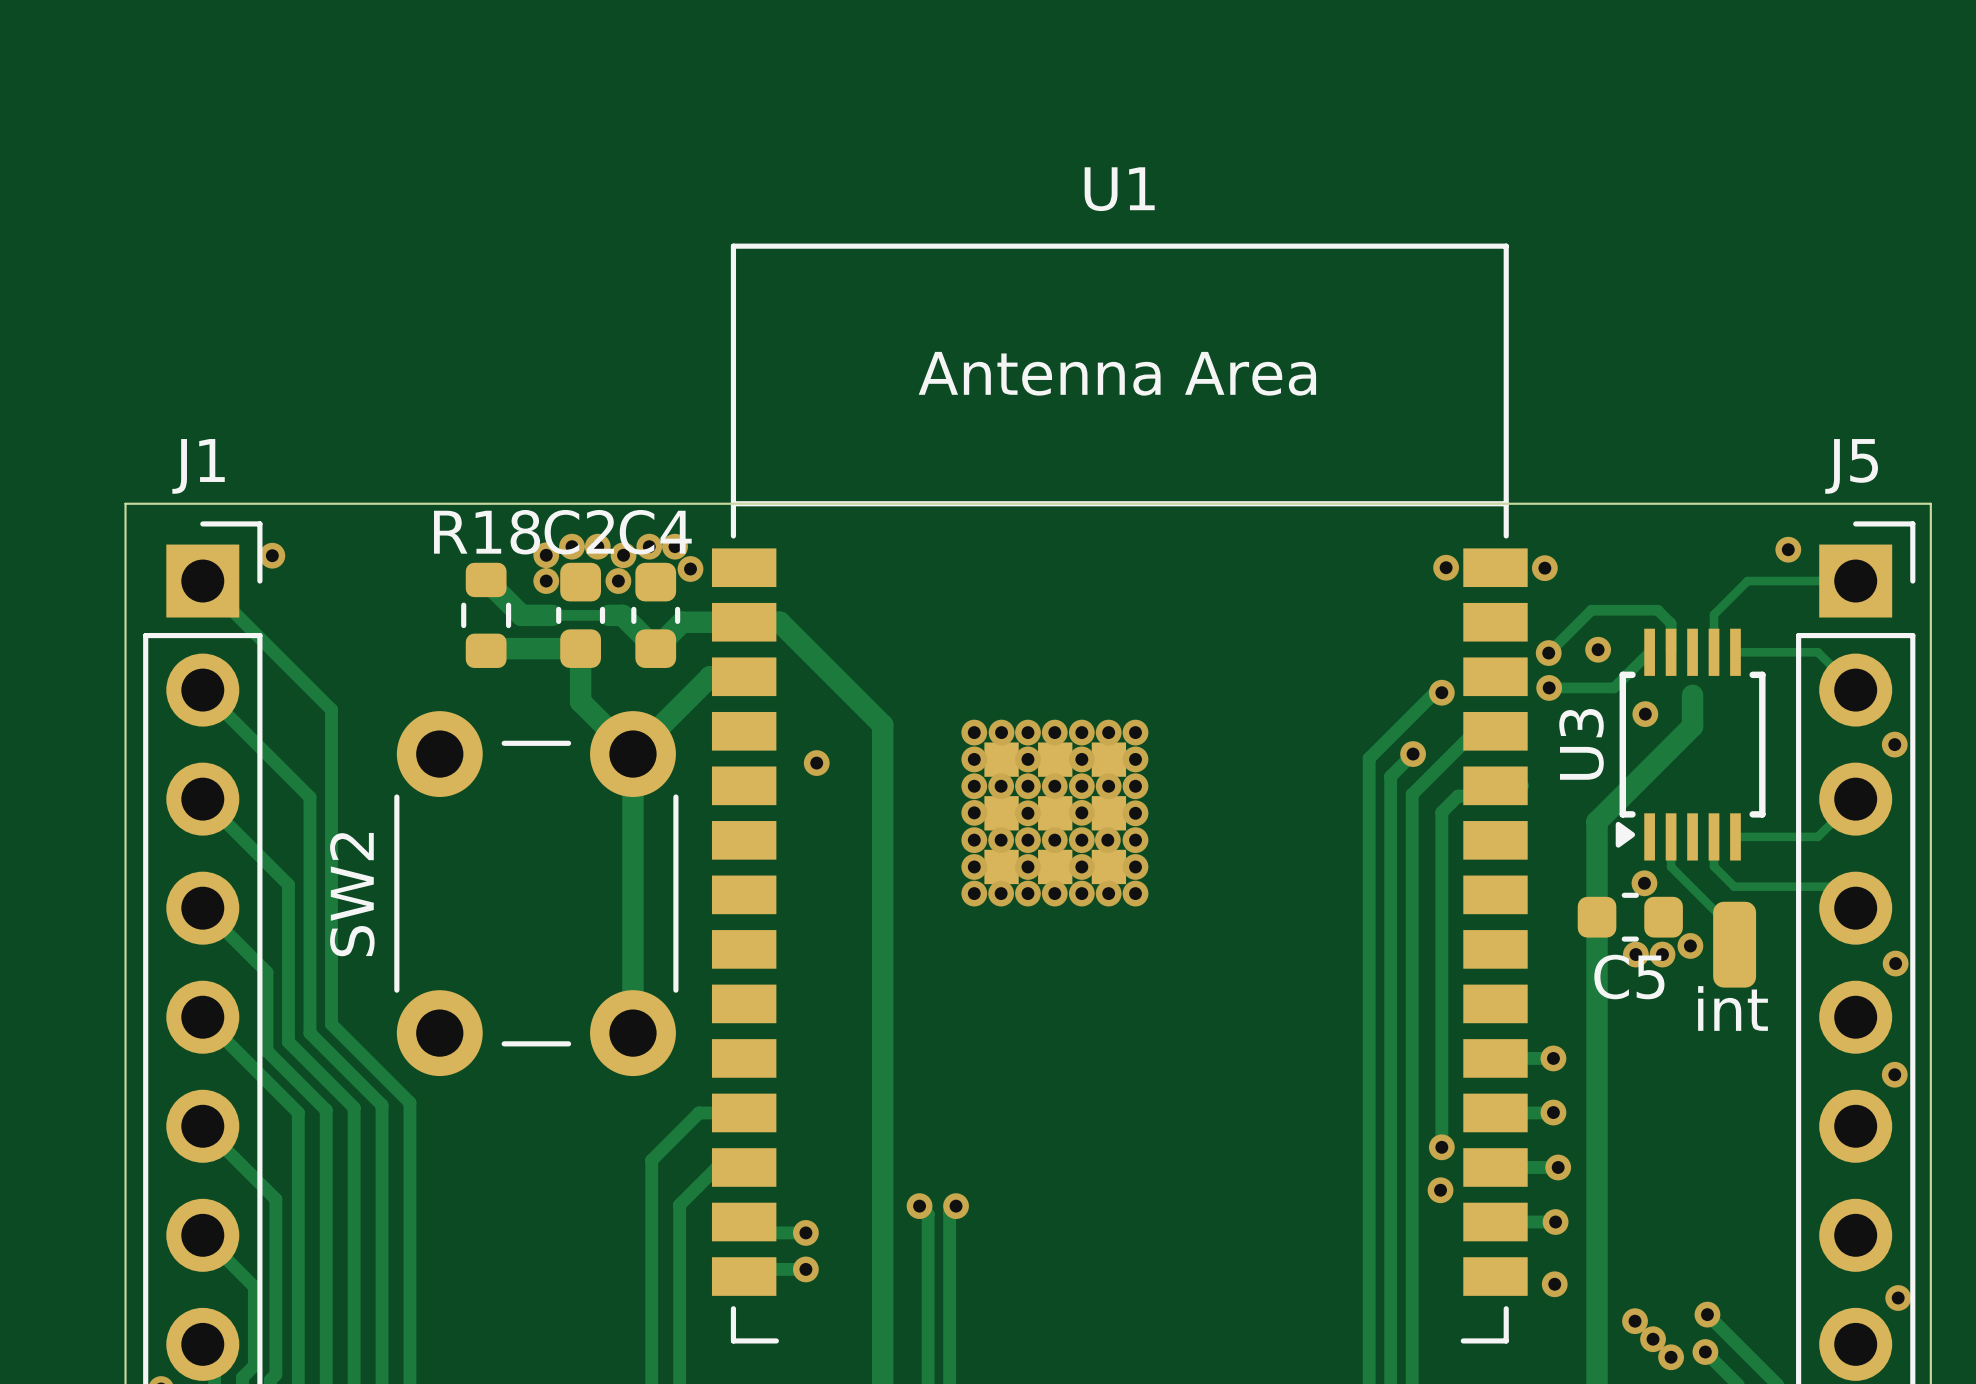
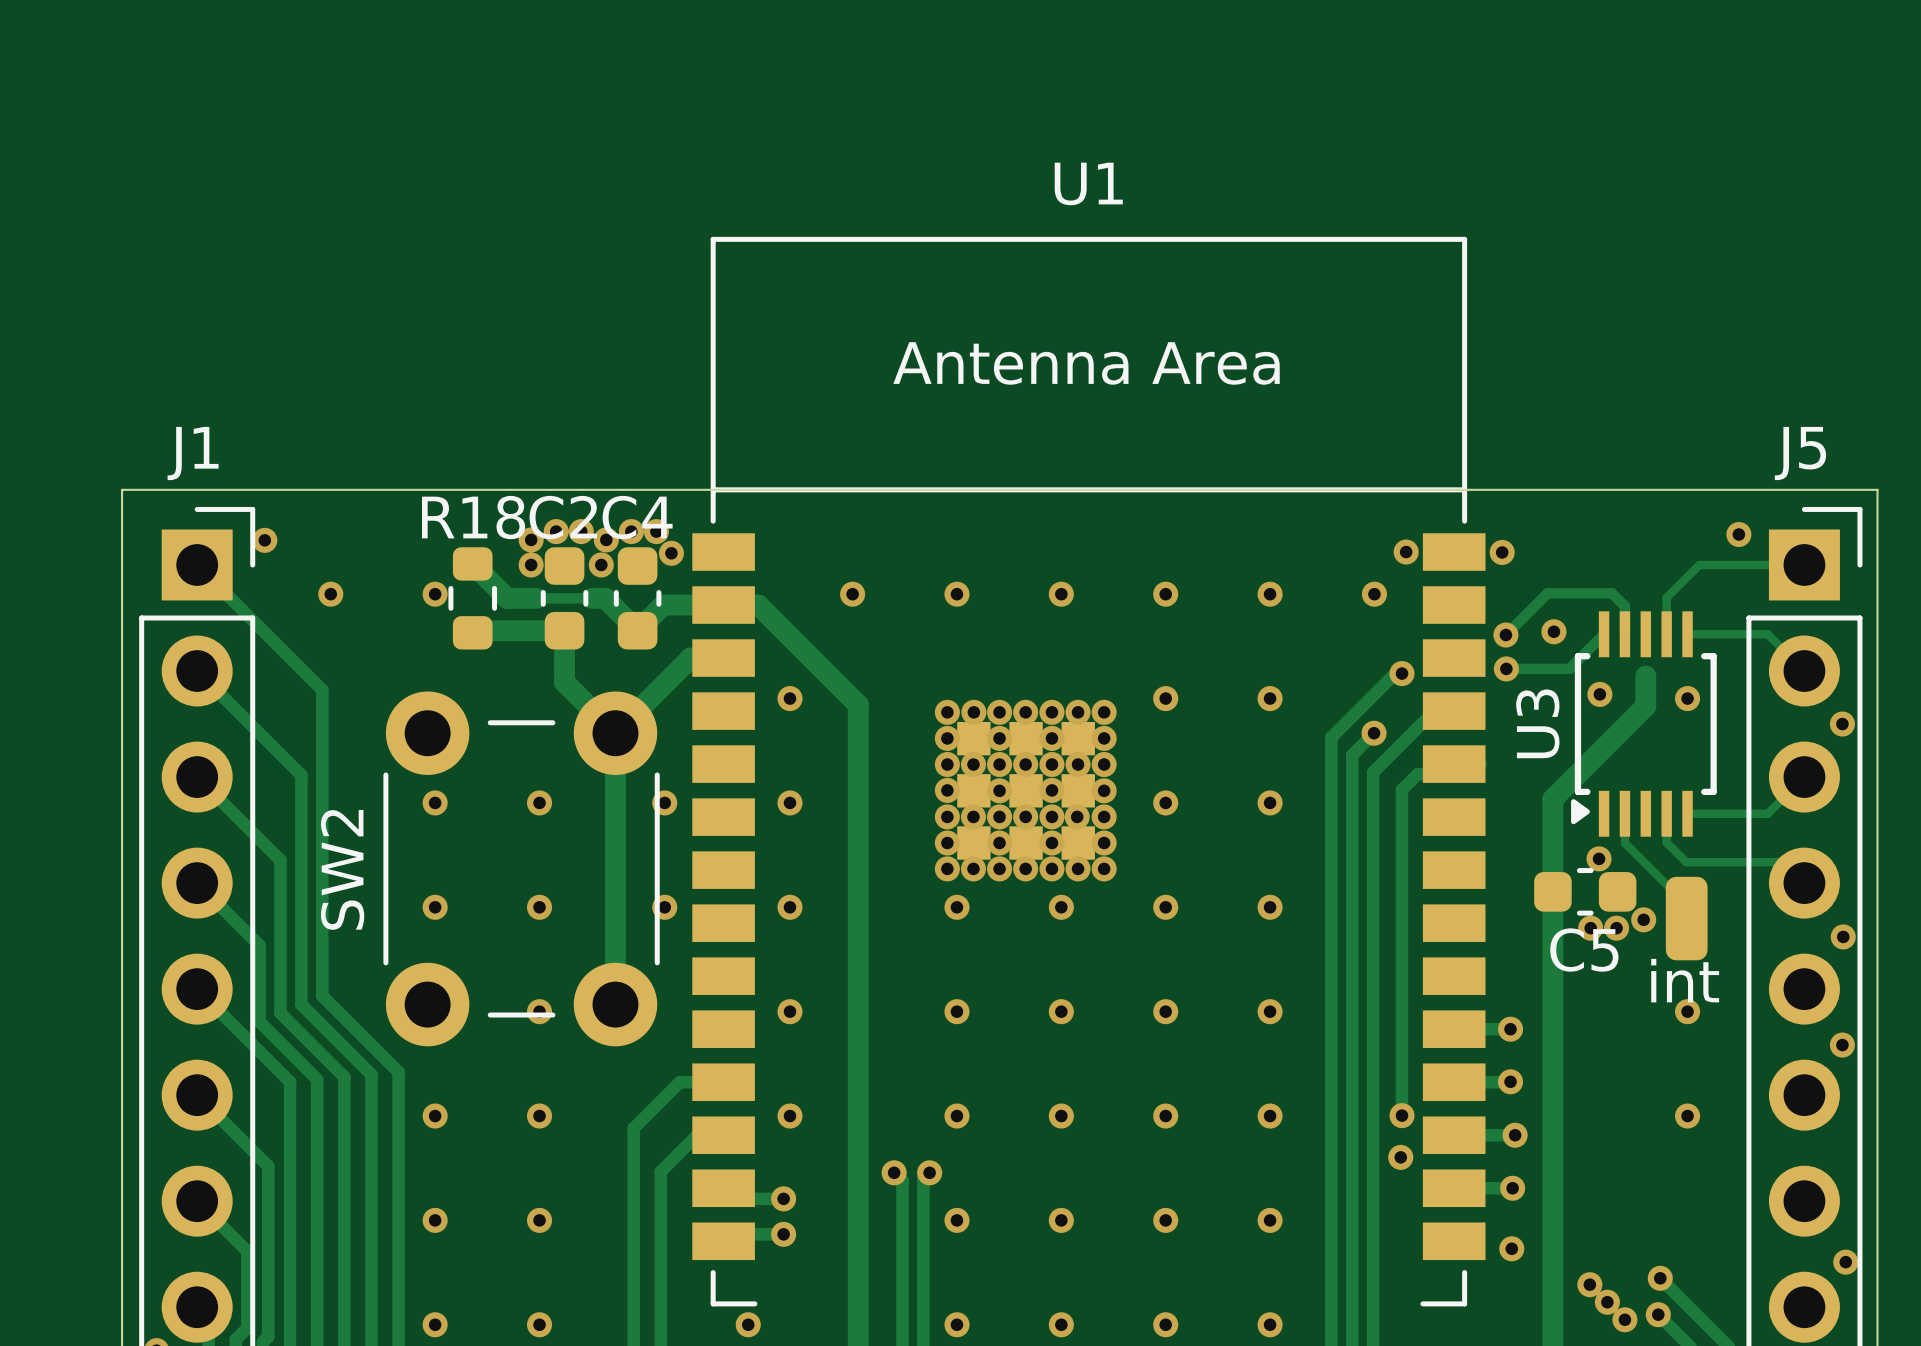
via: none -> (330, 594)
via: none -> (435, 594)
via: none -> (852, 594)
via: none -> (956, 594)
via: none -> (1061, 594)
via: none -> (1165, 594)
via: none -> (1270, 594)
via: none -> (1374, 594)
via: none -> (789, 698)
via: none -> (1165, 698)
via: none -> (1270, 698)
via: none -> (1687, 698)
via: (816, 763) -> none
via: none -> (435, 802)
via: none -> (539, 802)
via: none -> (664, 802)
via: none -> (789, 802)
via: none -> (1165, 802)
via: none -> (1270, 802)
via: none -> (435, 907)
via: none -> (539, 907)
via: none -> (664, 907)
via: none -> (789, 907)
via: none -> (956, 907)
via: none -> (1061, 907)
via: none -> (1165, 907)
via: none -> (1270, 907)
via: none -> (539, 1011)
via: none -> (789, 1011)
via: none -> (956, 1011)
via: none -> (1061, 1011)
via: none -> (1165, 1011)
via: none -> (1270, 1011)
via: none -> (1687, 1011)
via: none -> (435, 1116)
via: none -> (539, 1116)
via: none -> (789, 1116)
via: none -> (956, 1116)
via: none -> (1061, 1116)
via: none -> (1165, 1116)
via: none -> (1270, 1116)
via: none -> (1687, 1116)
via: none -> (435, 1220)
via: none -> (539, 1220)
via: none -> (956, 1220)
via: none -> (1061, 1220)
via: none -> (1165, 1220)
via: none -> (1270, 1220)
via: none -> (435, 1324)
via: none -> (539, 1324)
via: none -> (748, 1324)
via: none -> (956, 1324)
via: none -> (1061, 1324)
via: none -> (1165, 1324)
via: none -> (1270, 1324)

